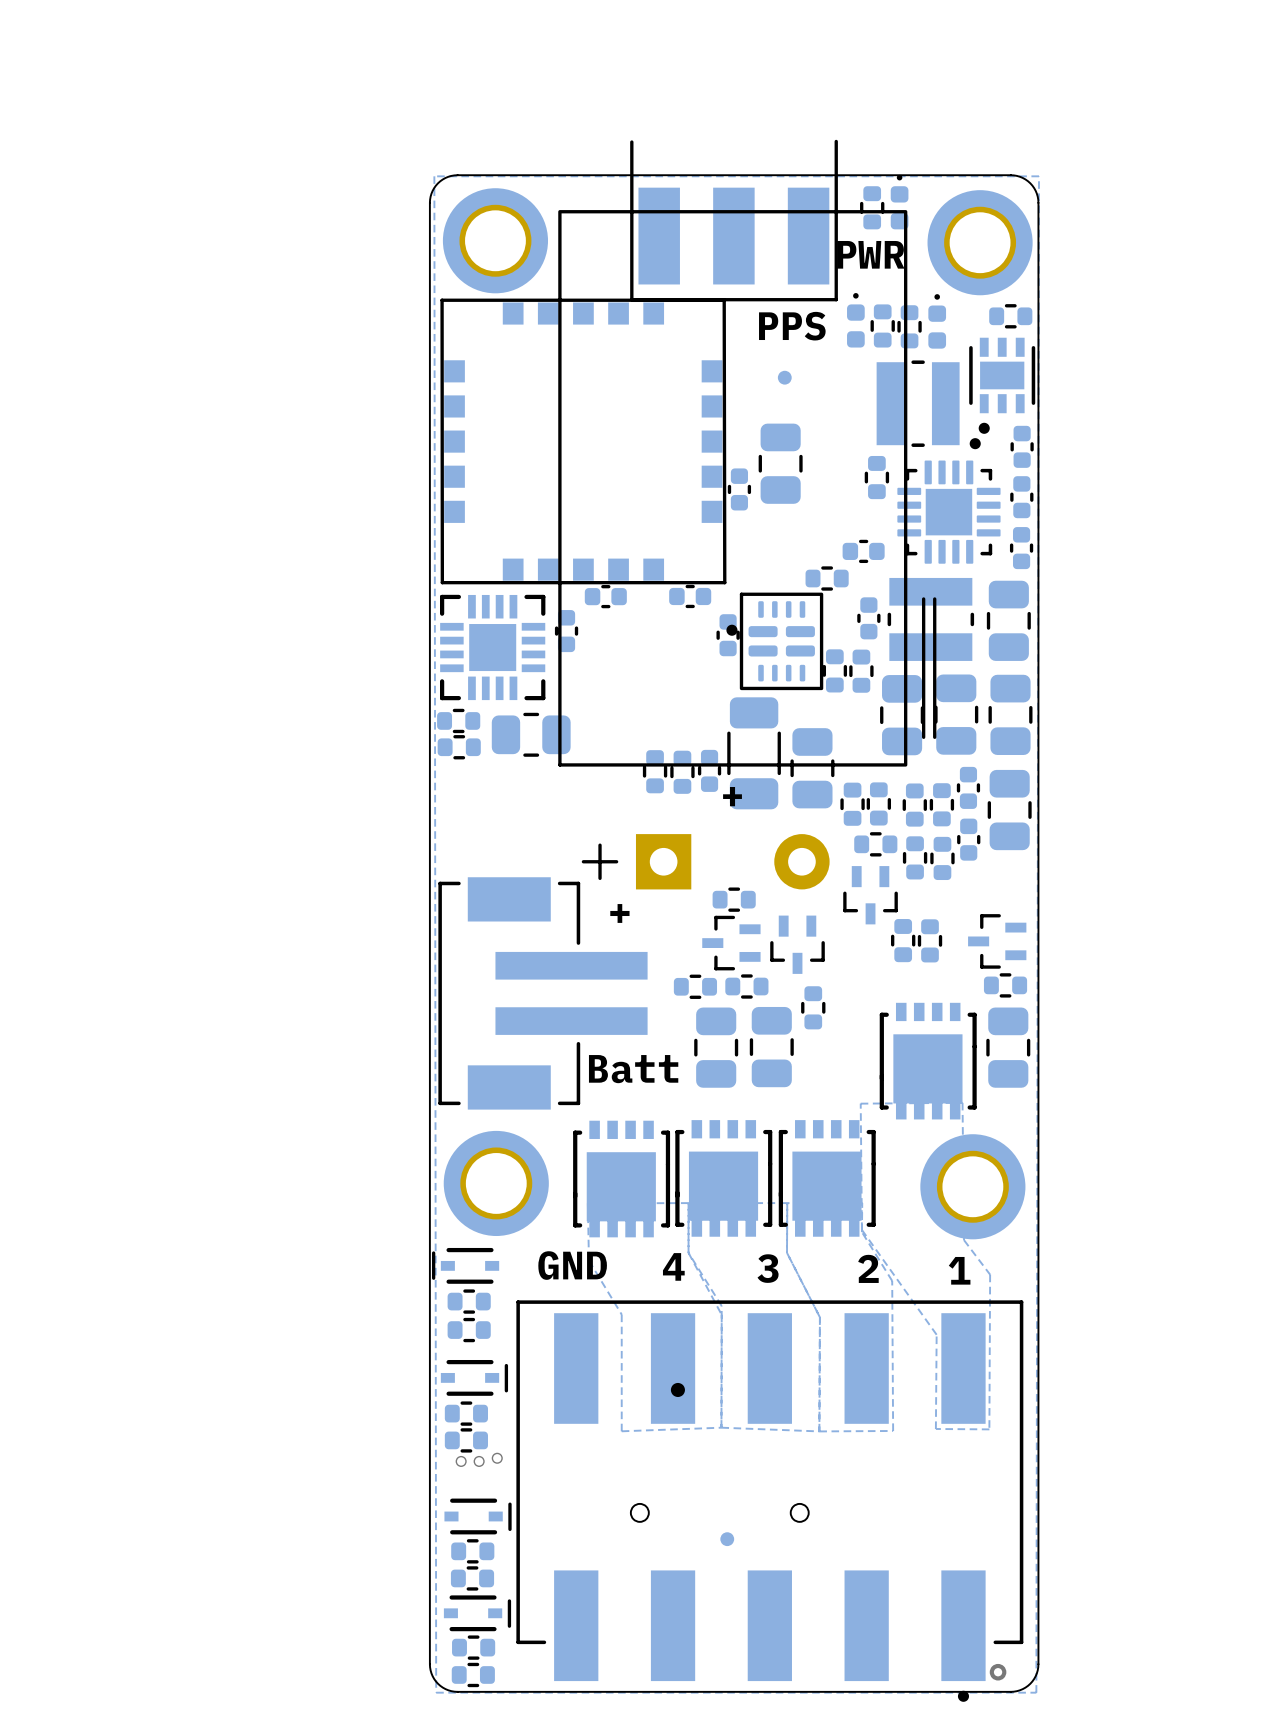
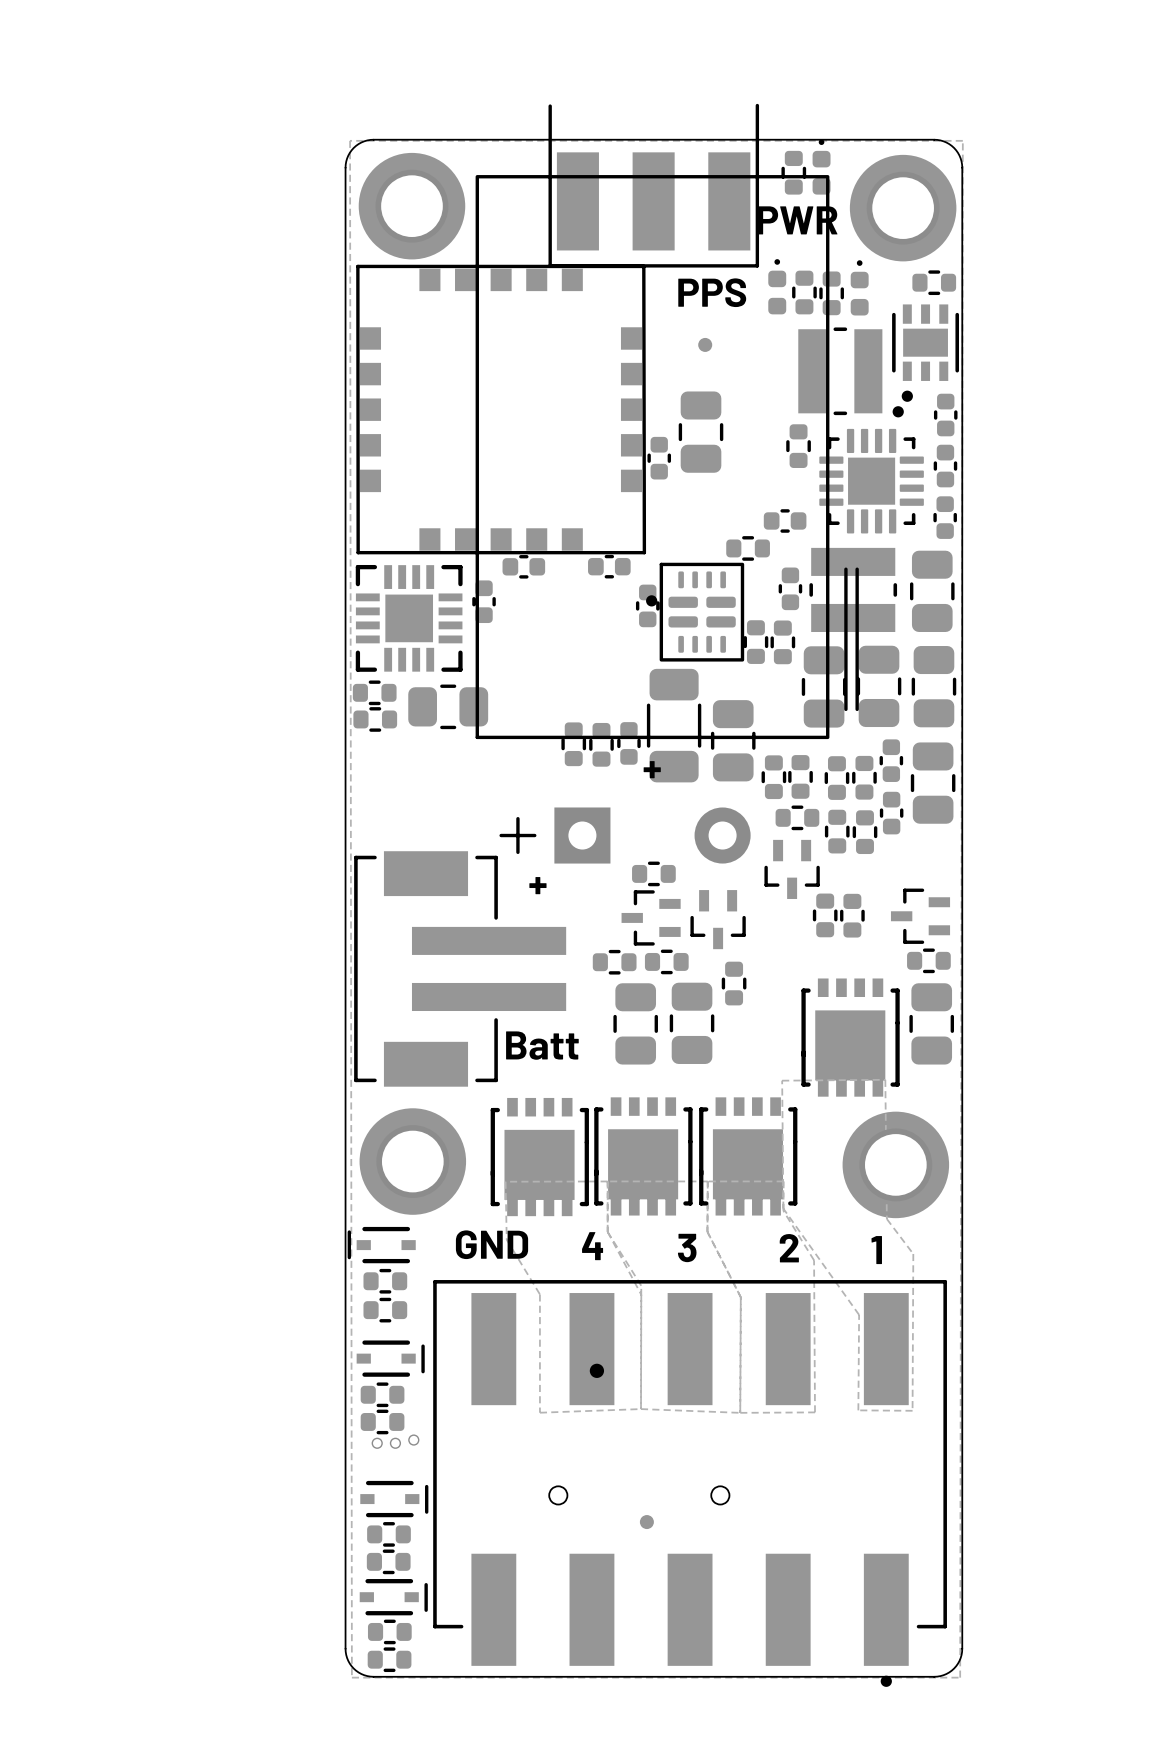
via: (998, 1672) -> none

